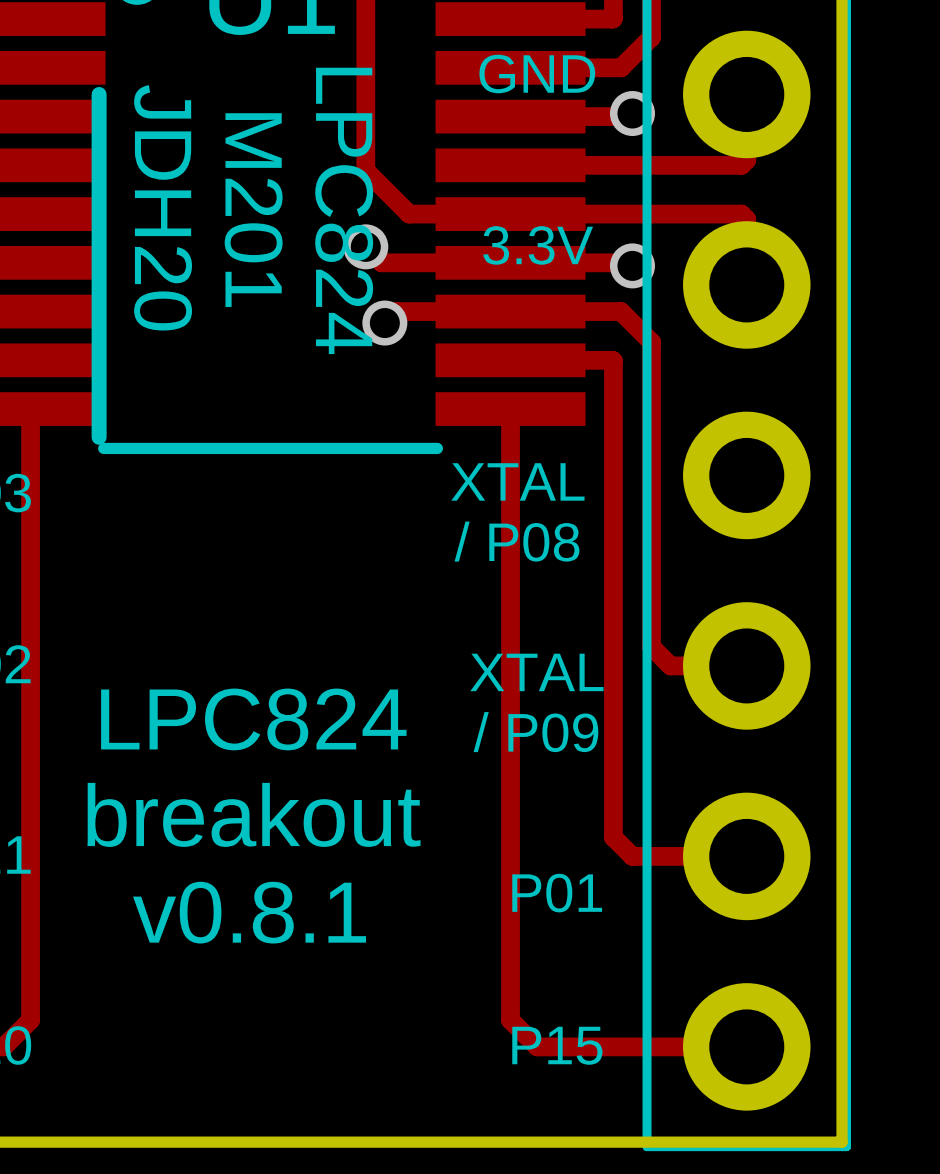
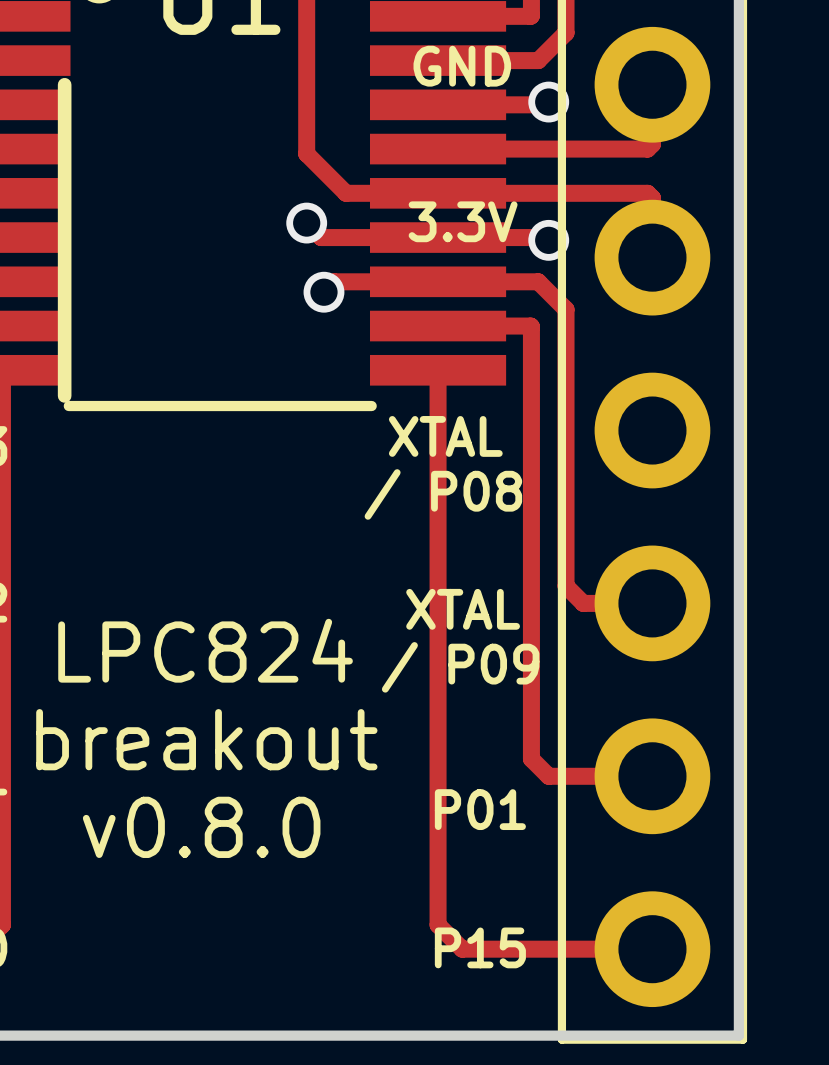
text: JDH20 (163, 207) -> none
text: M201 (253, 210) -> none
text: LPC824 (344, 210) -> none
text: v0.8.1 (249, 912) -> v0.8.0 (201, 827)

